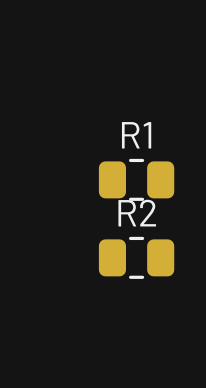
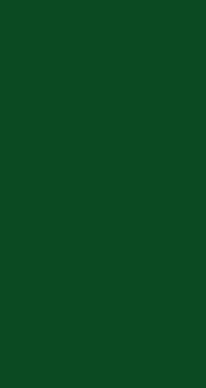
R1: (136, 179) -> none
R2: (136, 257) -> none

